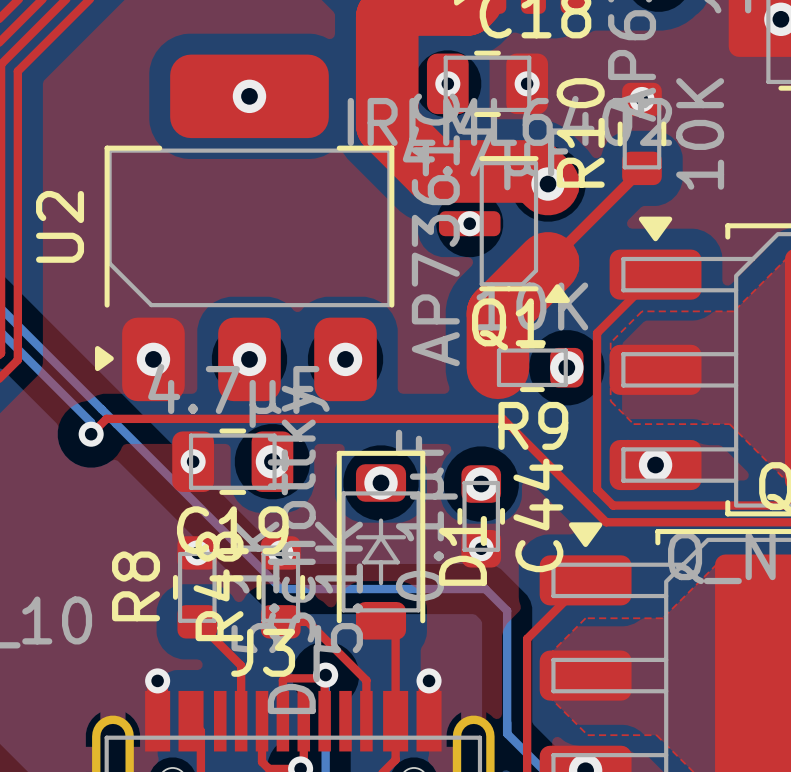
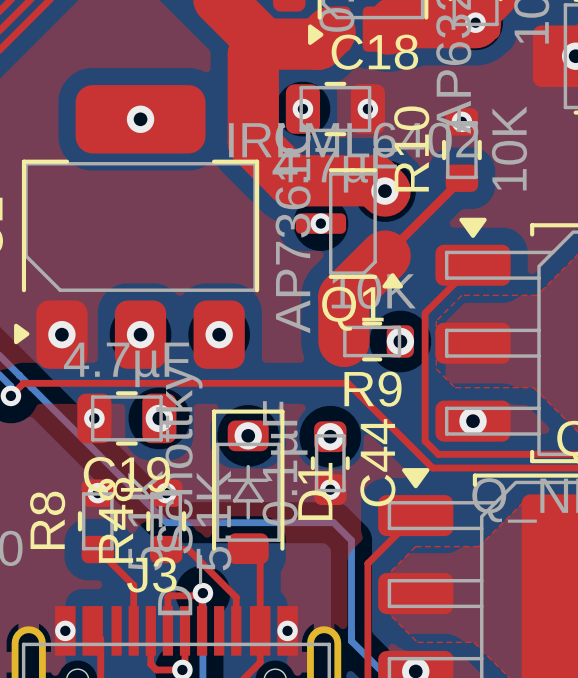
via position: (157, 680) -> (65, 630)
via position: (429, 680) -> (287, 630)

